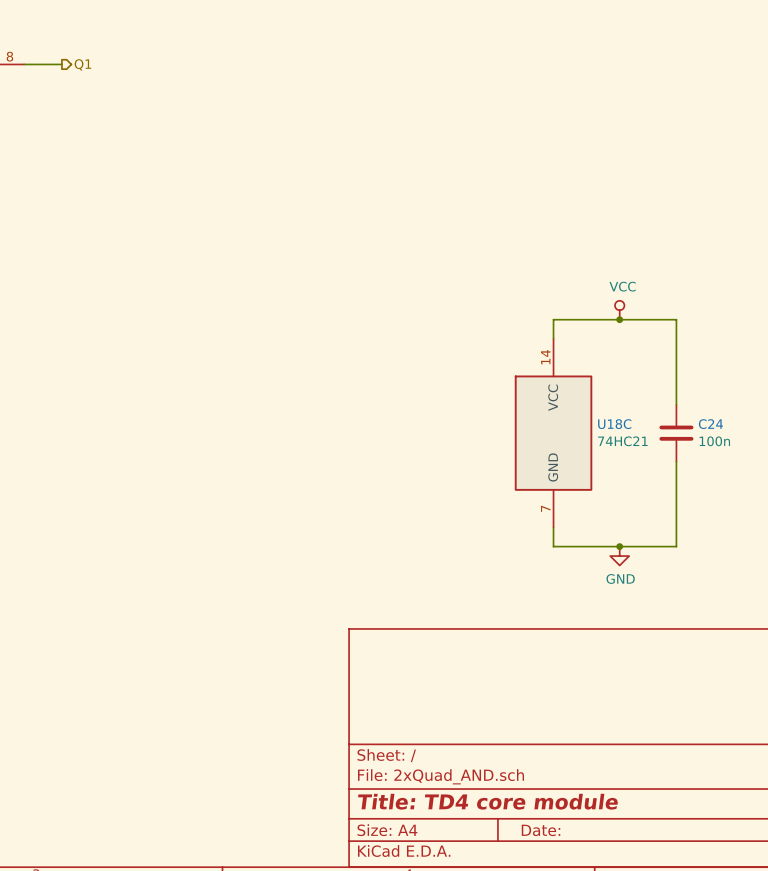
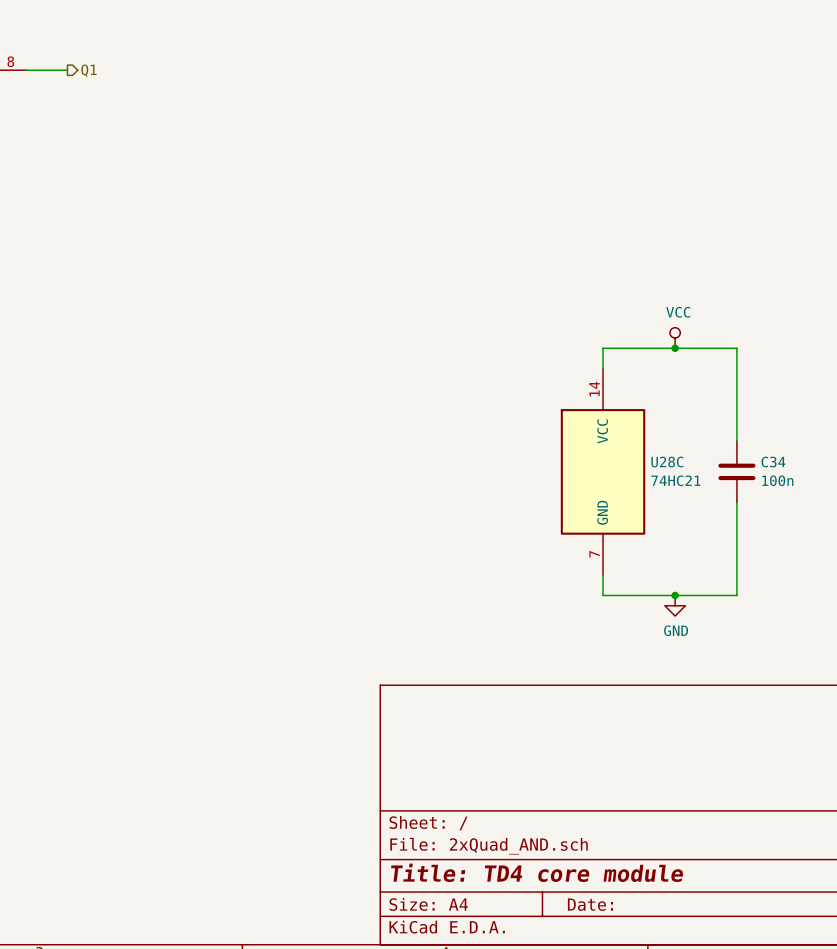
U18C name: U18C (614, 424) -> U28C (667, 462)
C24 name: C24 (710, 424) -> C34 (773, 462)

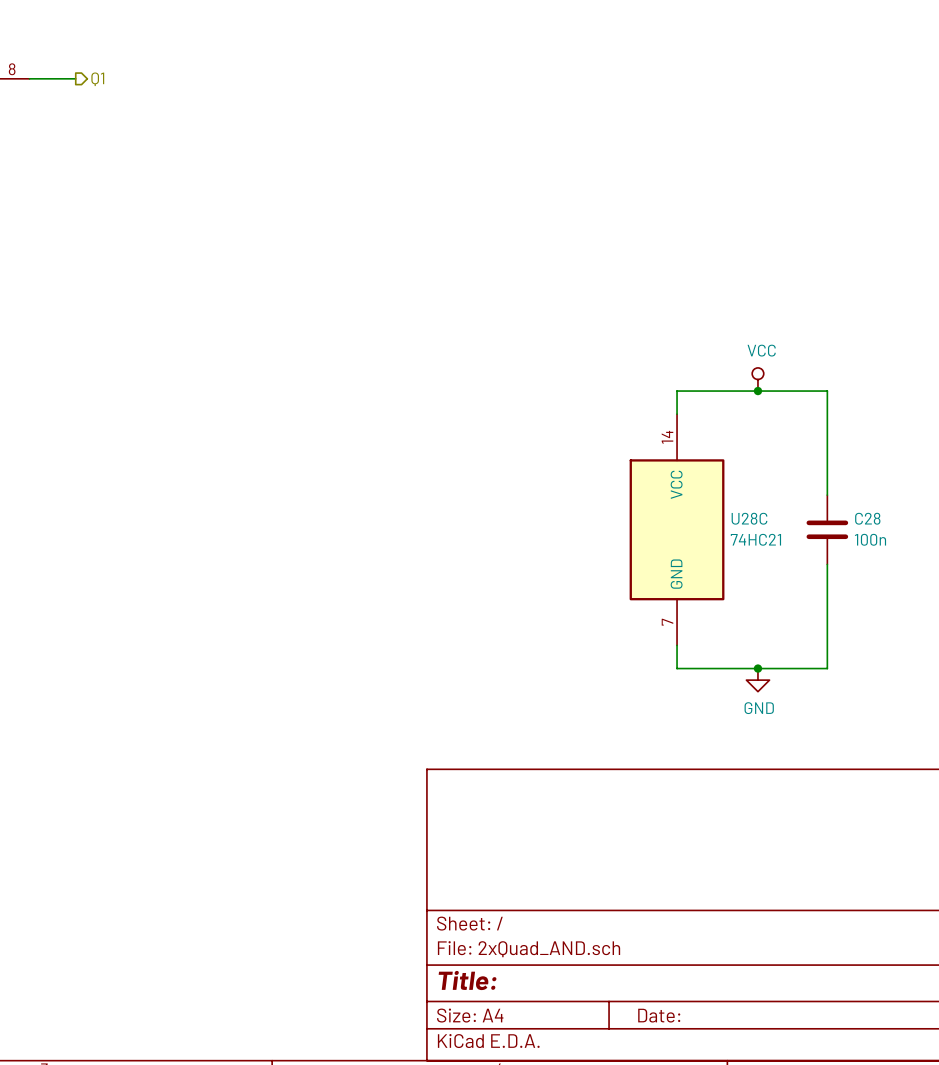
C34 name: C34 (773, 462) -> C28 (867, 518)
title block: Title: TD4 core module (537, 872) -> Title: (467, 980)

